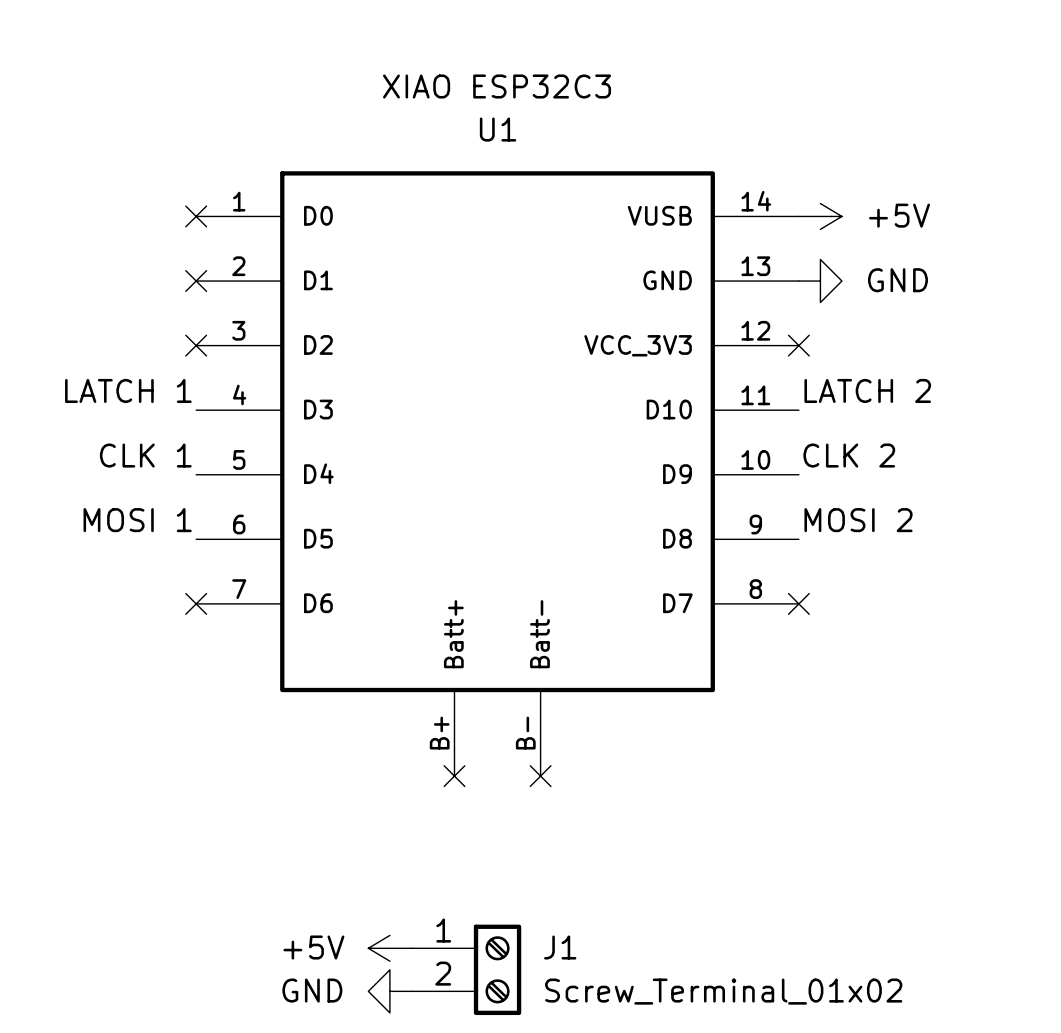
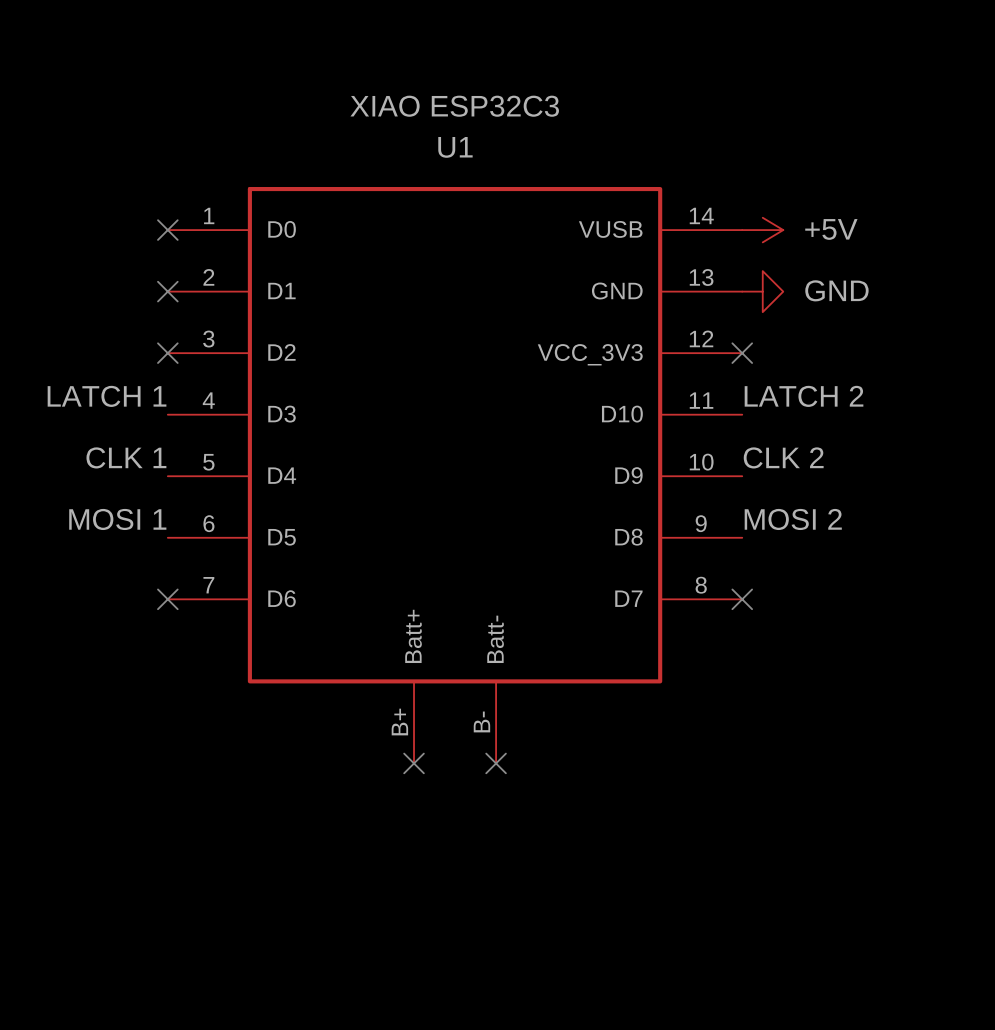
power symbol: +5V (389, 948) -> none
J1: Screw_Terminal_01x02 (466, 969) -> none
power symbol: GND (389, 991) -> none

